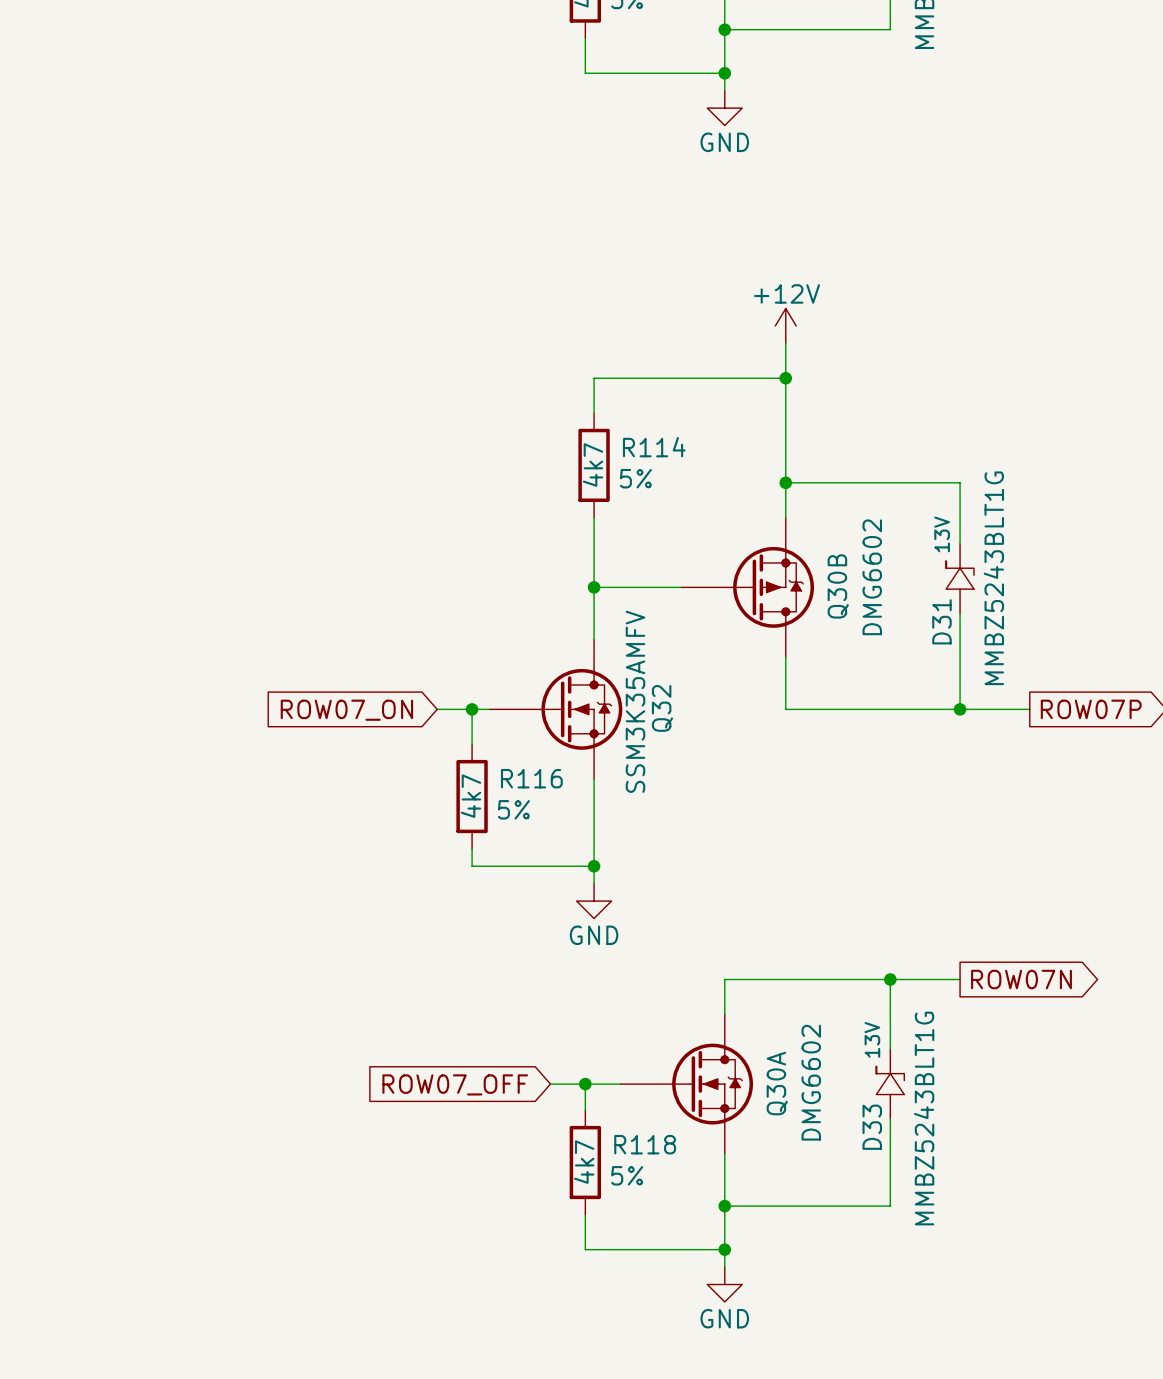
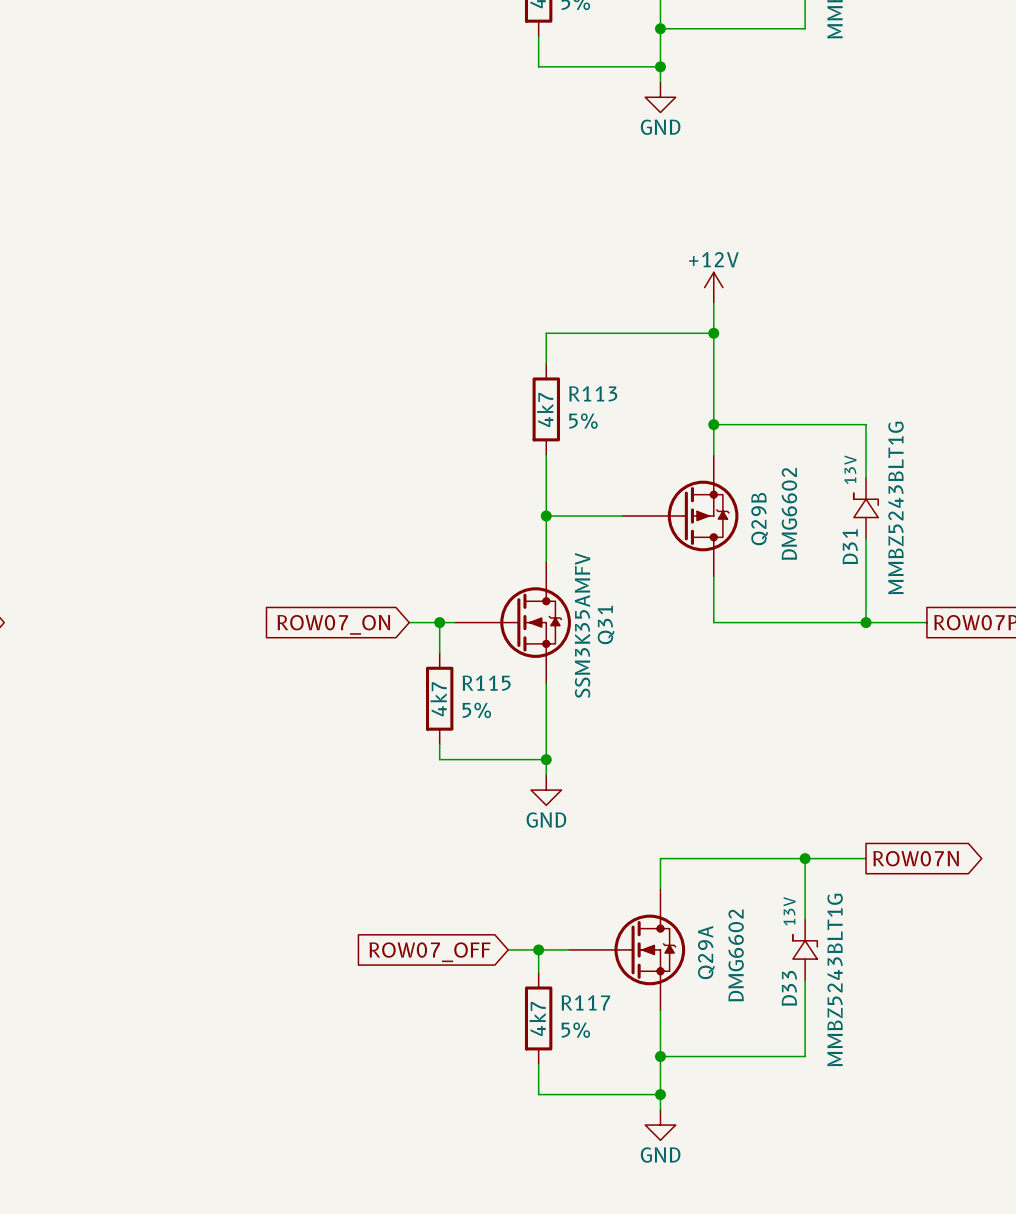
R114 name: R114 (654, 447) -> R113 (593, 393)
Q30B name: Q30B (838, 586) -> Q29B (759, 519)
Q32 name: Q32 (662, 708) -> Q31 (606, 625)
R116 name: R116 (531, 778) -> R115 (486, 683)
Q30A name: Q30A (777, 1083) -> Q29A (706, 952)
R118 name: R118 (645, 1144) -> R117 (585, 1002)

